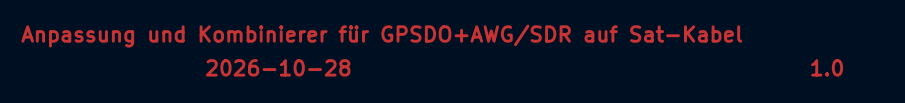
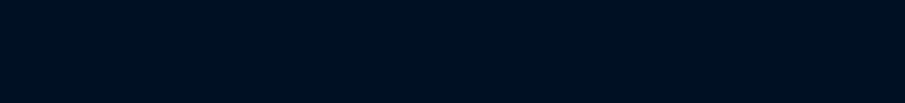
text: Anpassung und Kombinierer für GPSDO+AWG/SDR auf Sat-Kabel (381, 36) -> none
text: 2026-10-28 (278, 67) -> none
text: 1.0 (827, 67) -> none

